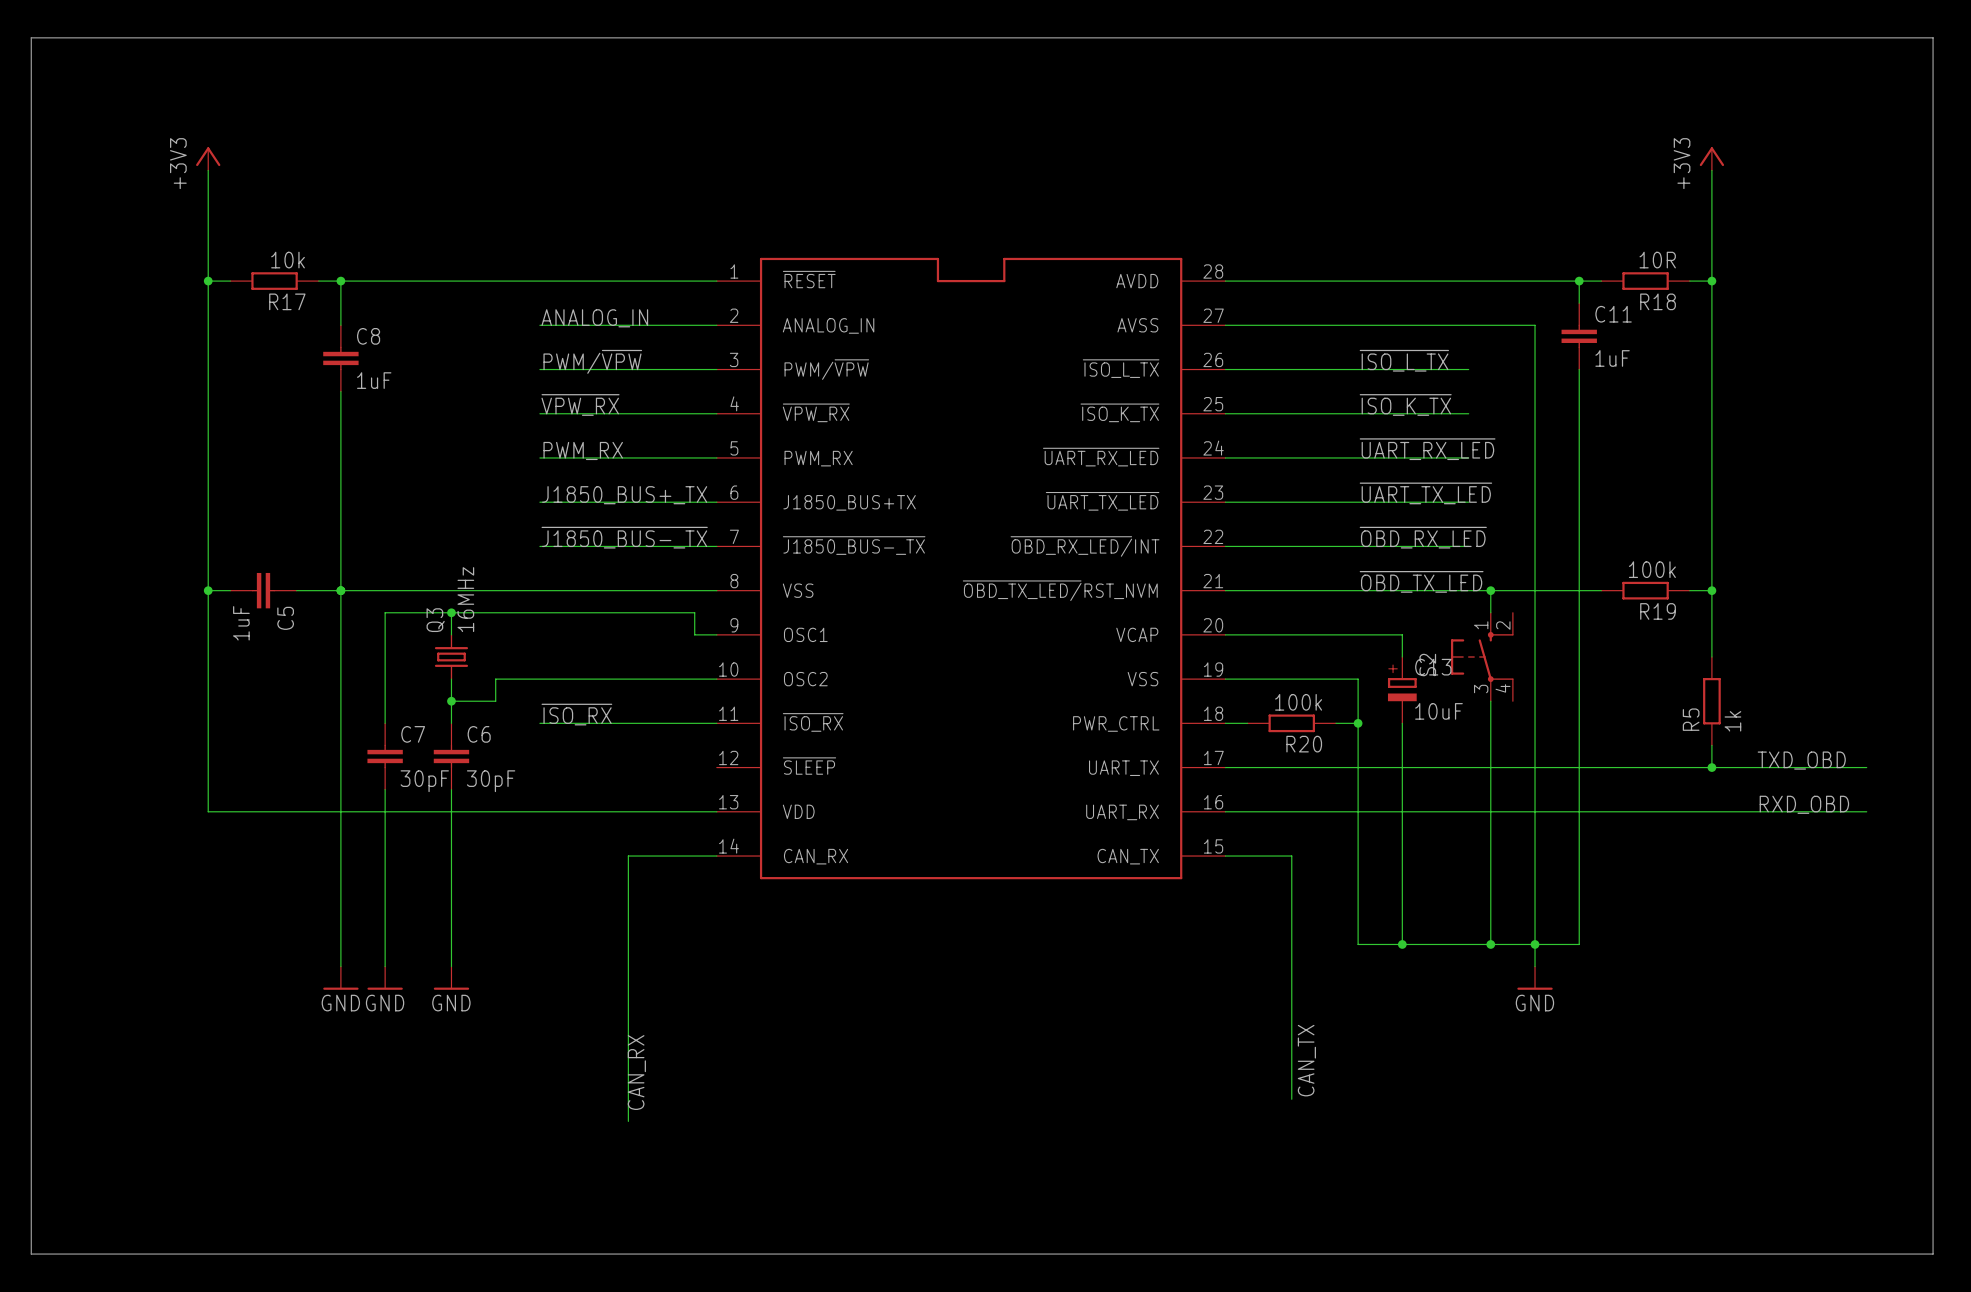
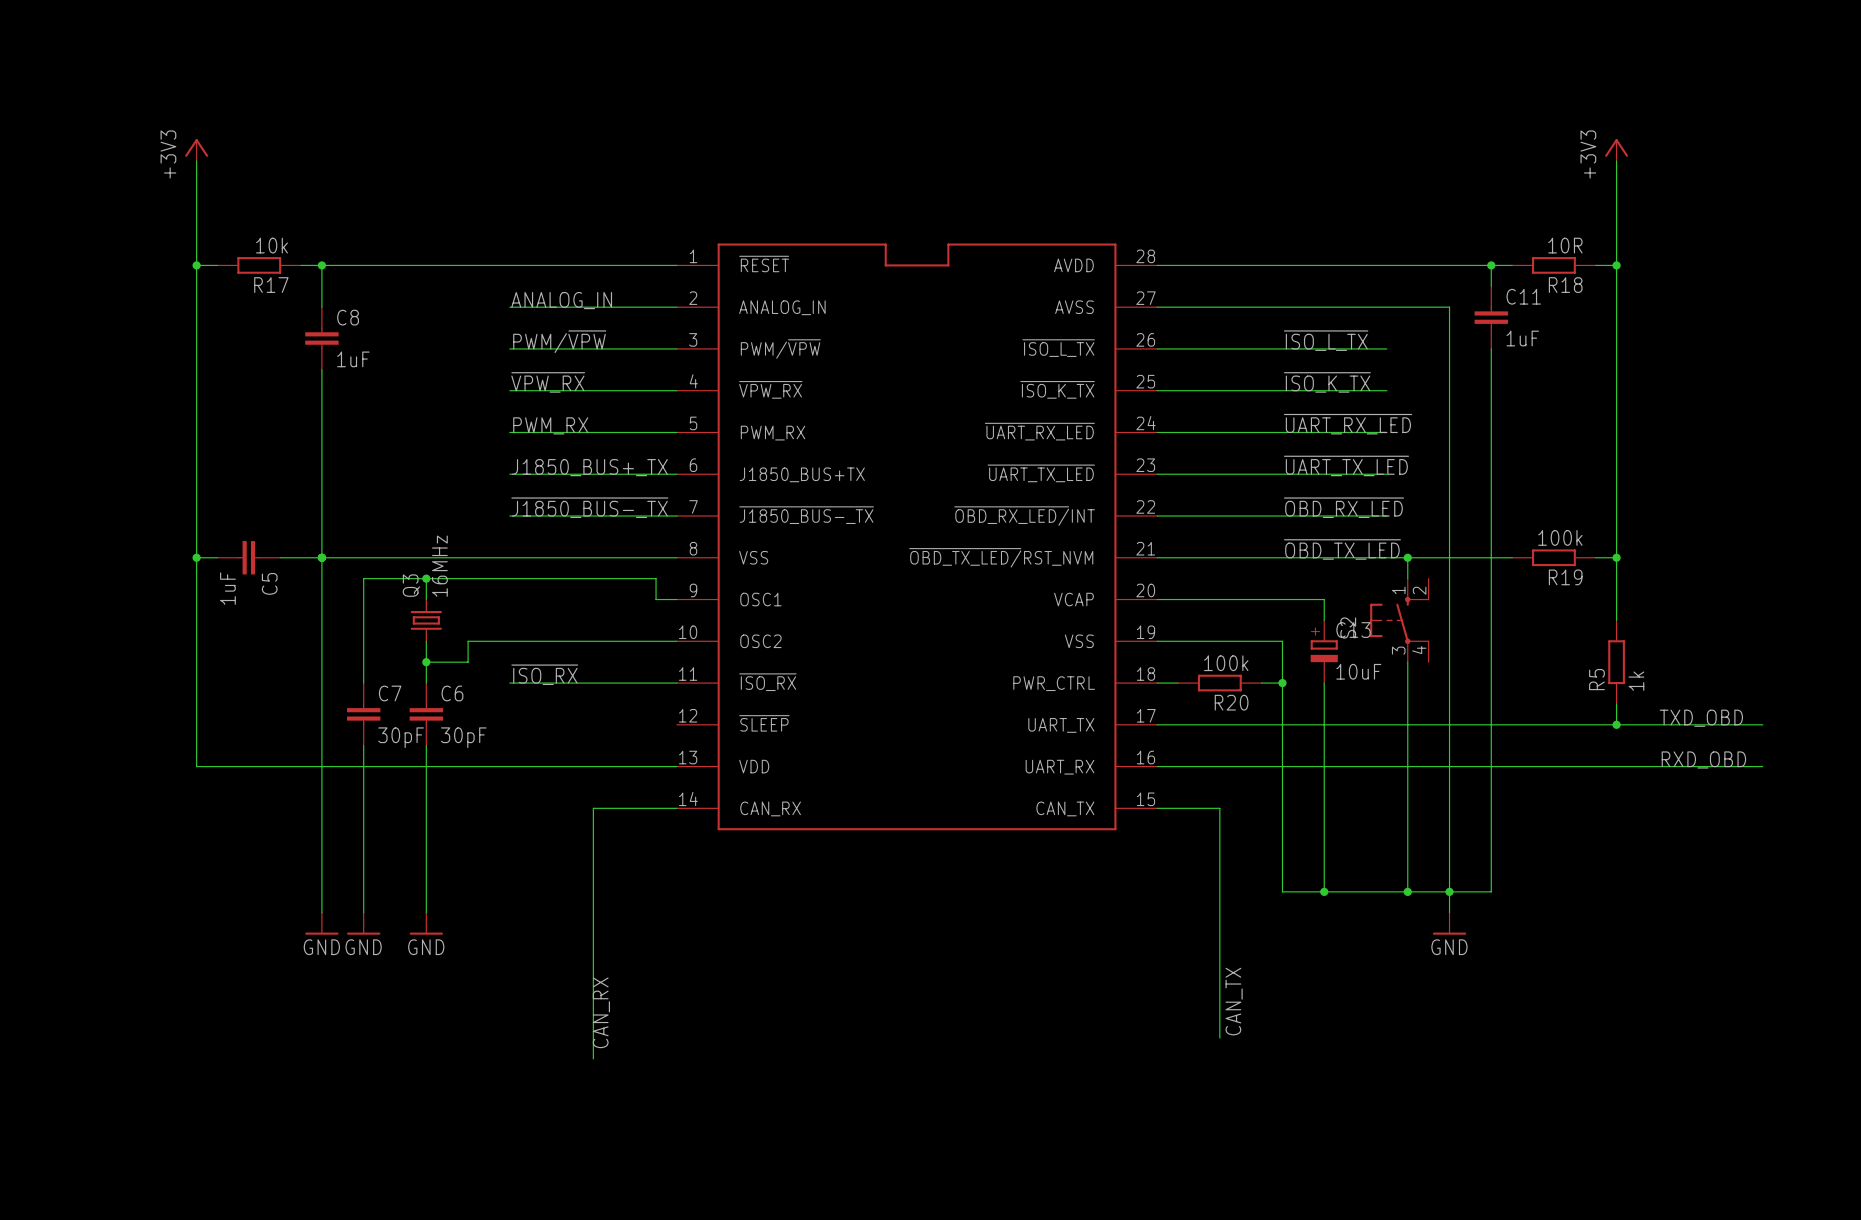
line: (31, 37) (1933, 37) (1933, 1254) (31, 1254) (31, 37) -> none

